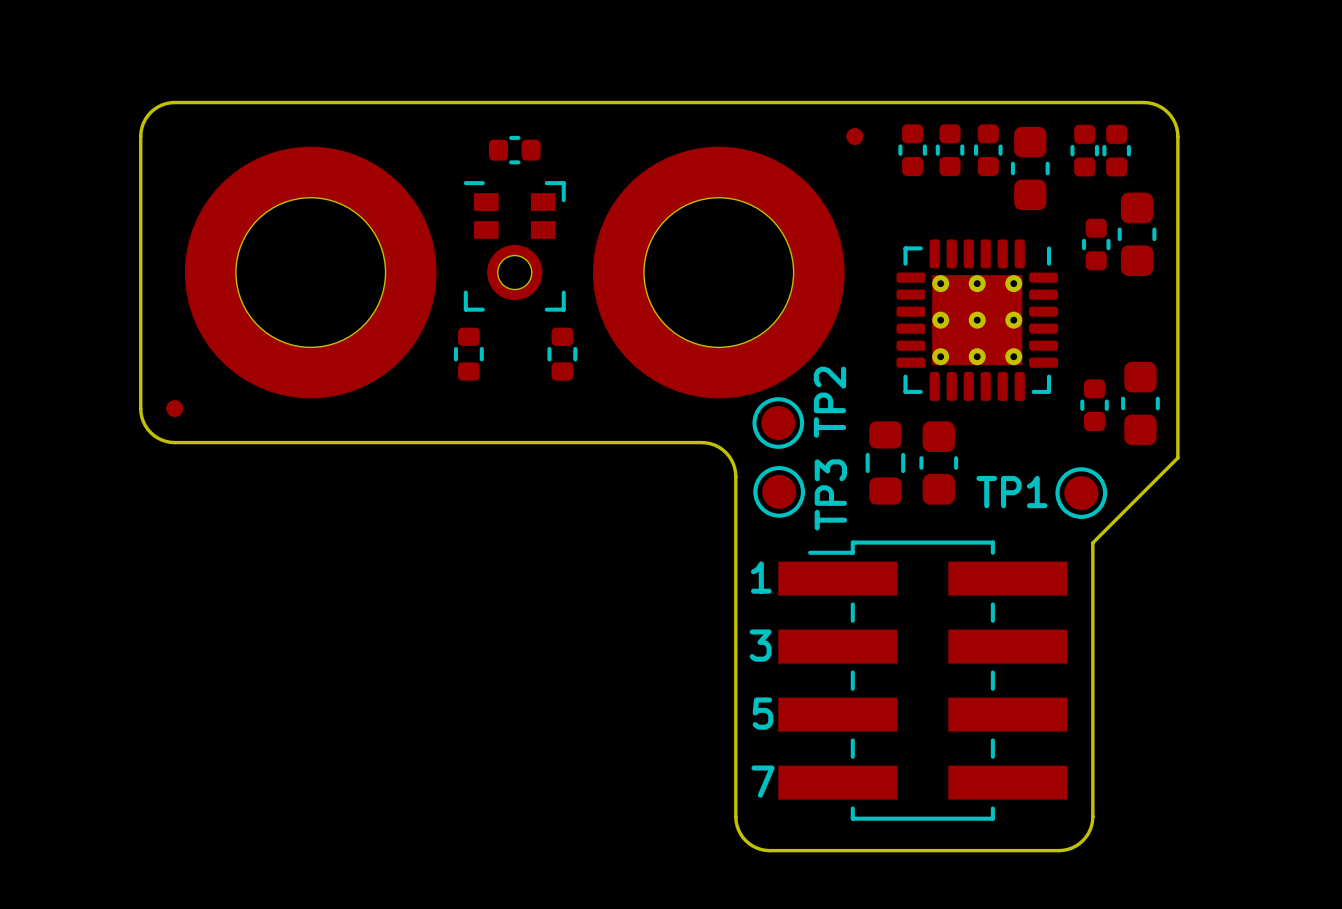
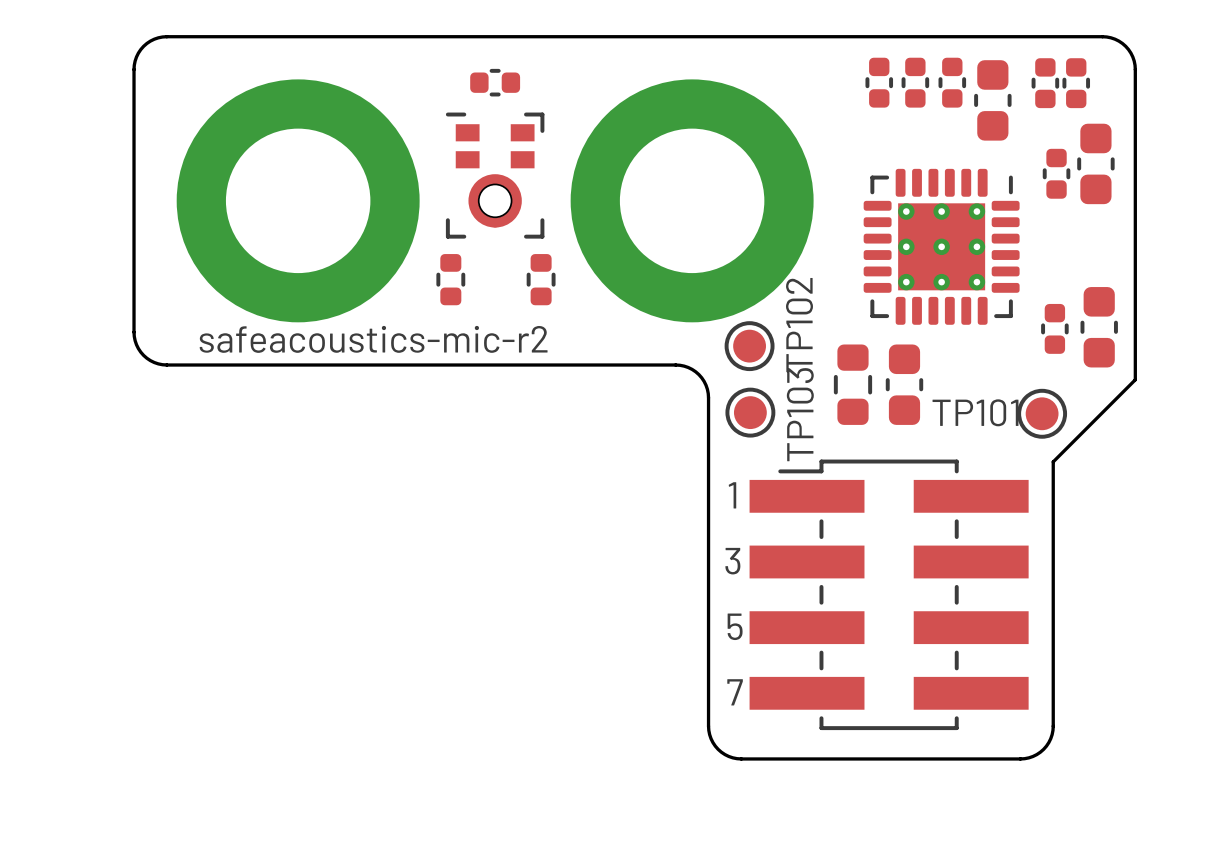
part: (854, 136) -> none
part footprint: [184, 146, 437, 399] -> [176, 79, 420, 323]
part footprint: [592, 146, 845, 399] -> [570, 79, 814, 323]
TP2 name: TP2 (829, 402) -> TP102 (799, 325)
part: (174, 408) -> none
text: none -> safeacoustics-mic-r2 (373, 339)
TP1 name: TP1 (1011, 492) -> TP101 (975, 412)
TP3 name: TP3 (830, 494) -> TP103 (800, 414)

